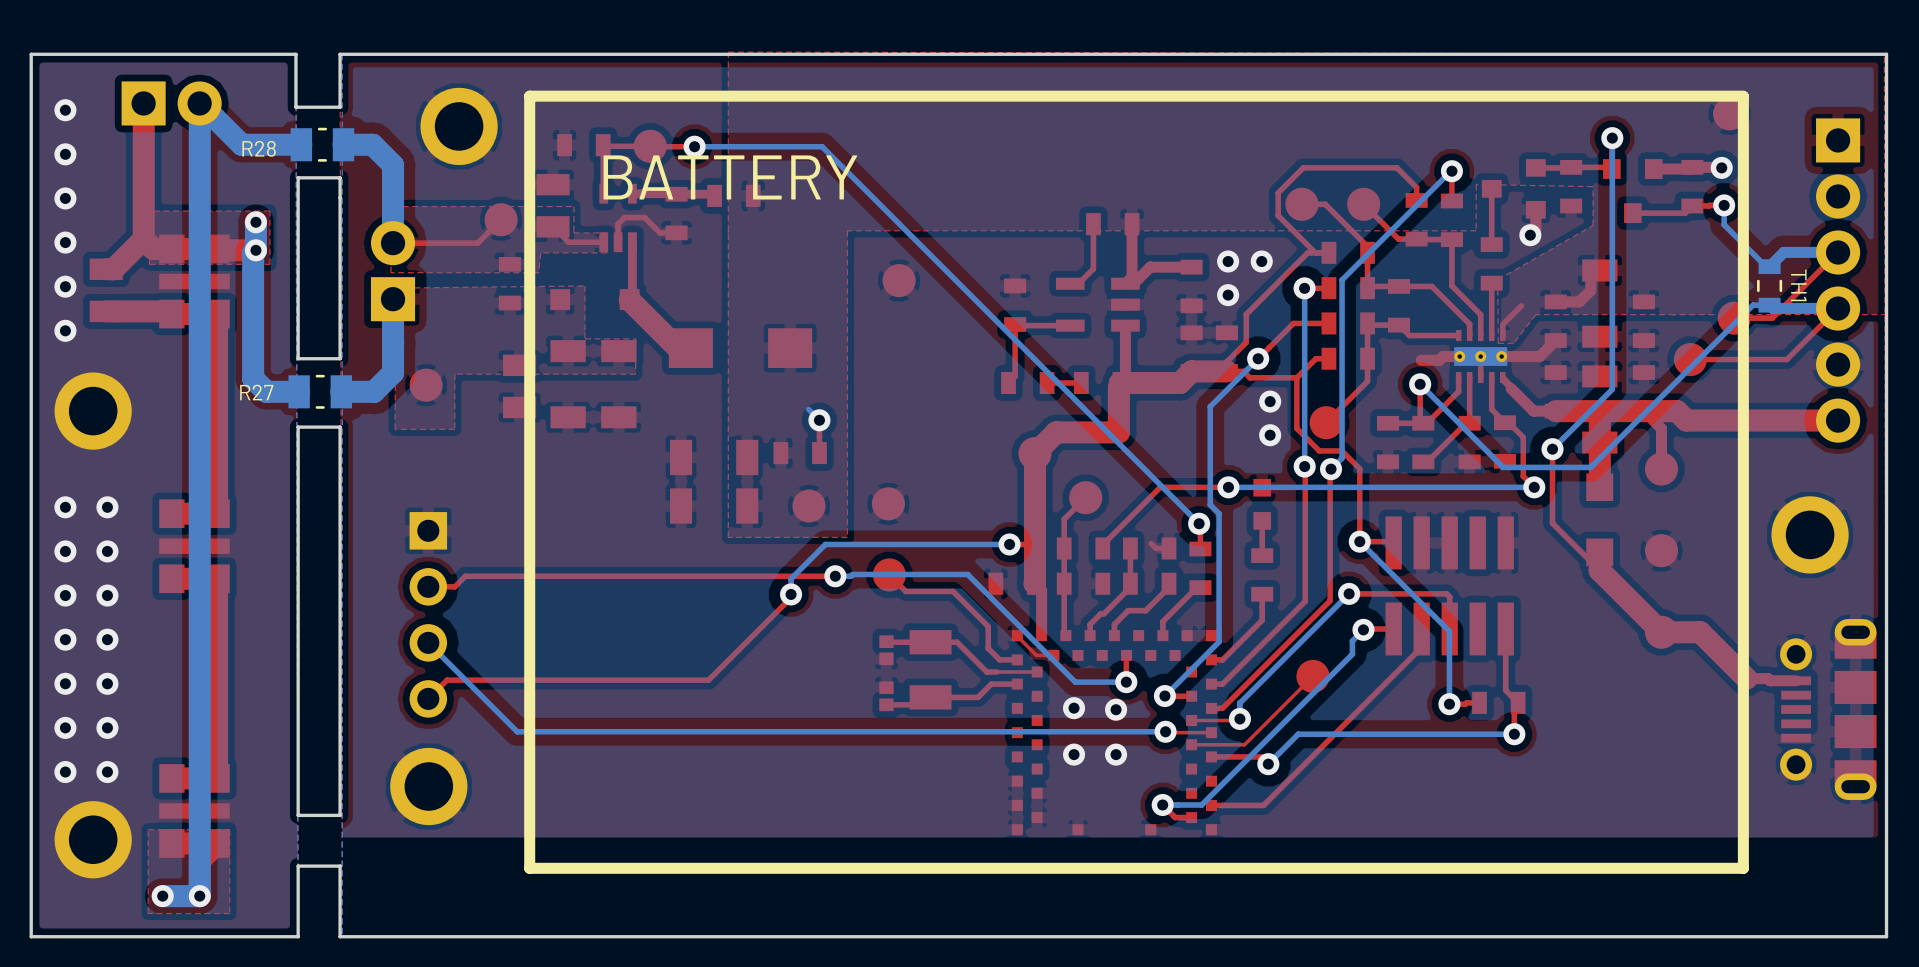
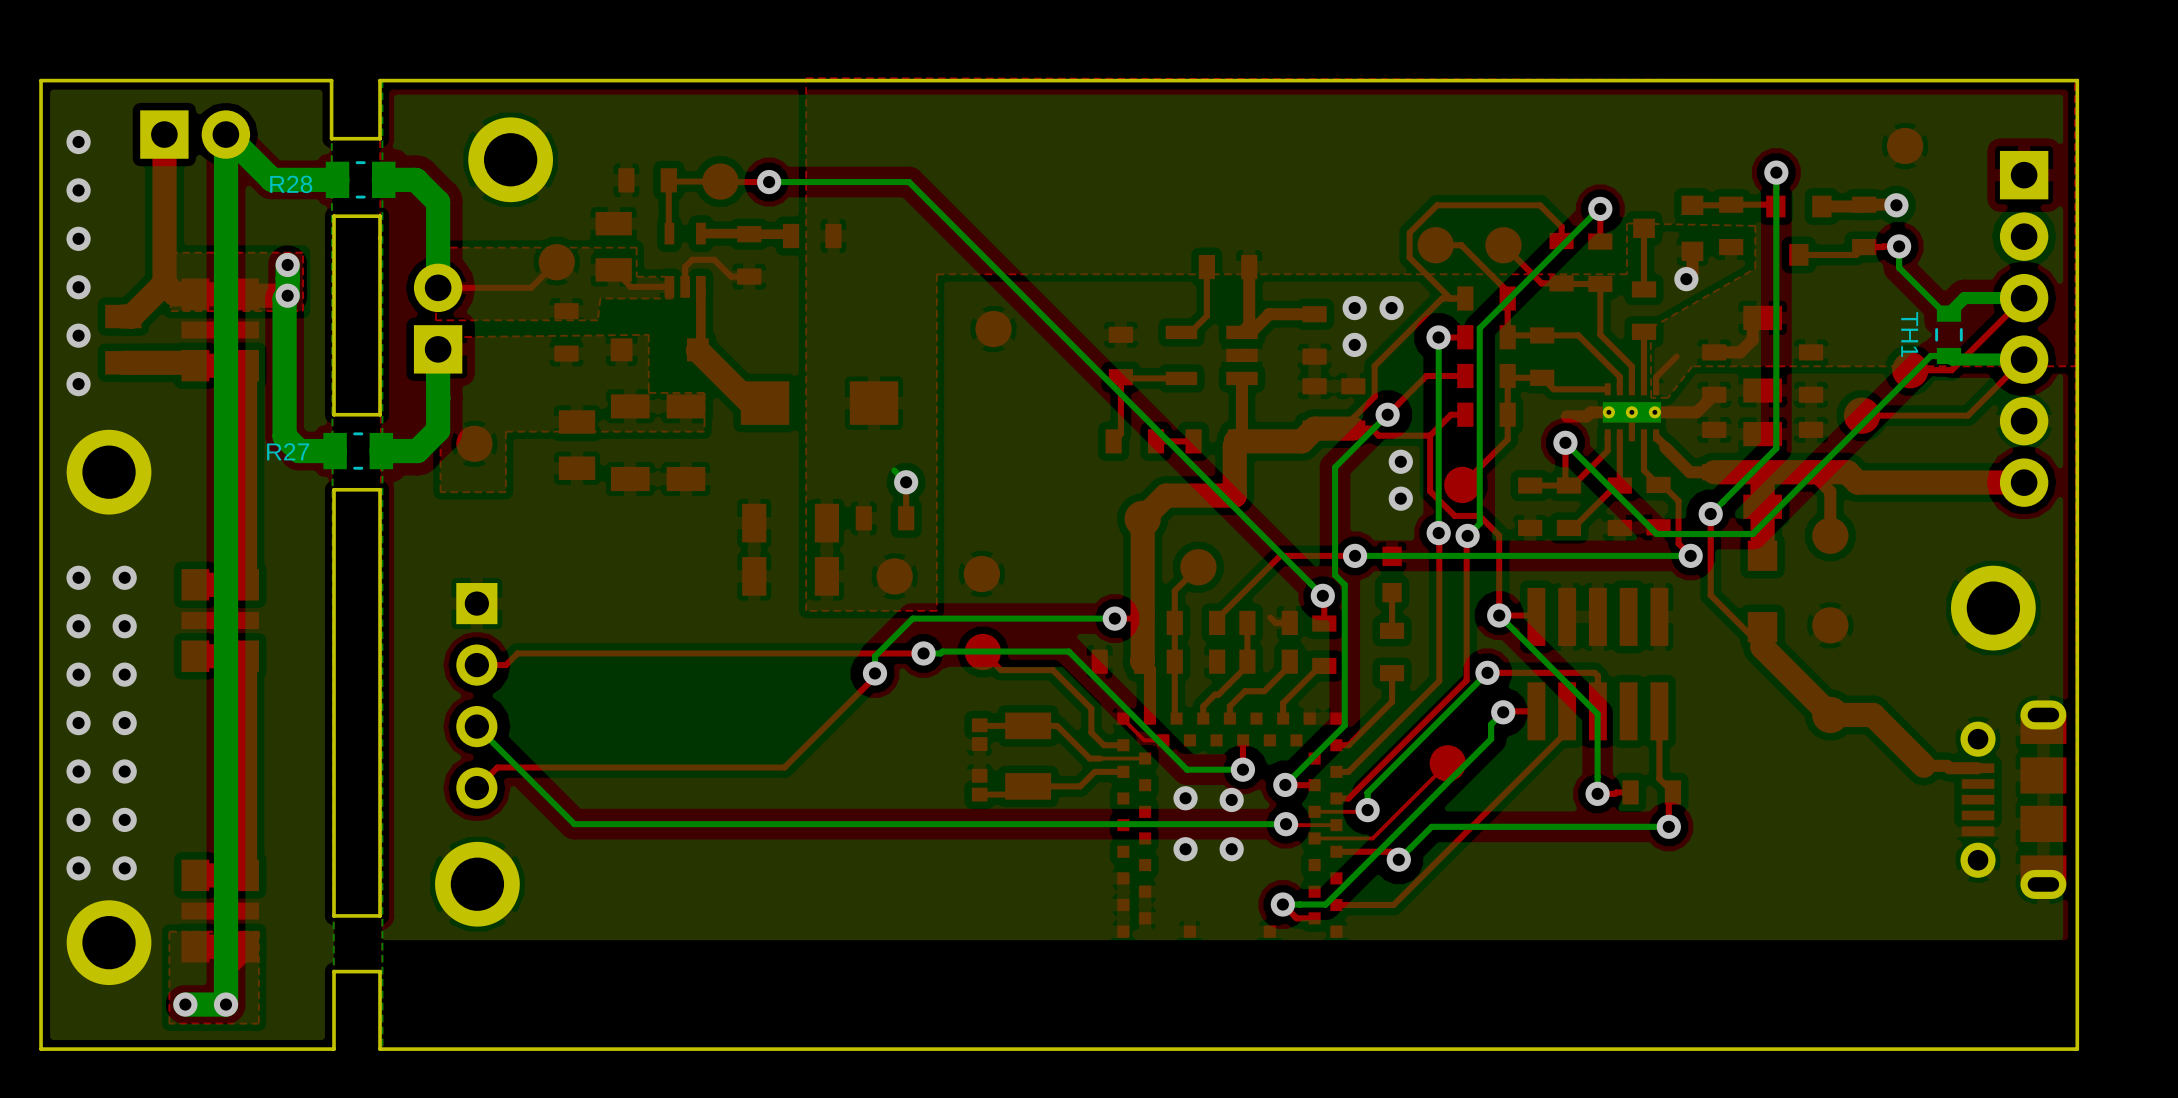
line: (1743, 96) (529, 96) (529, 868) (1743, 868) (1743, 96) -> none
text: BATTERY (730, 177) -> none
TH1 name position: TH1 (1798, 285) -> TH1 (1909, 334)

